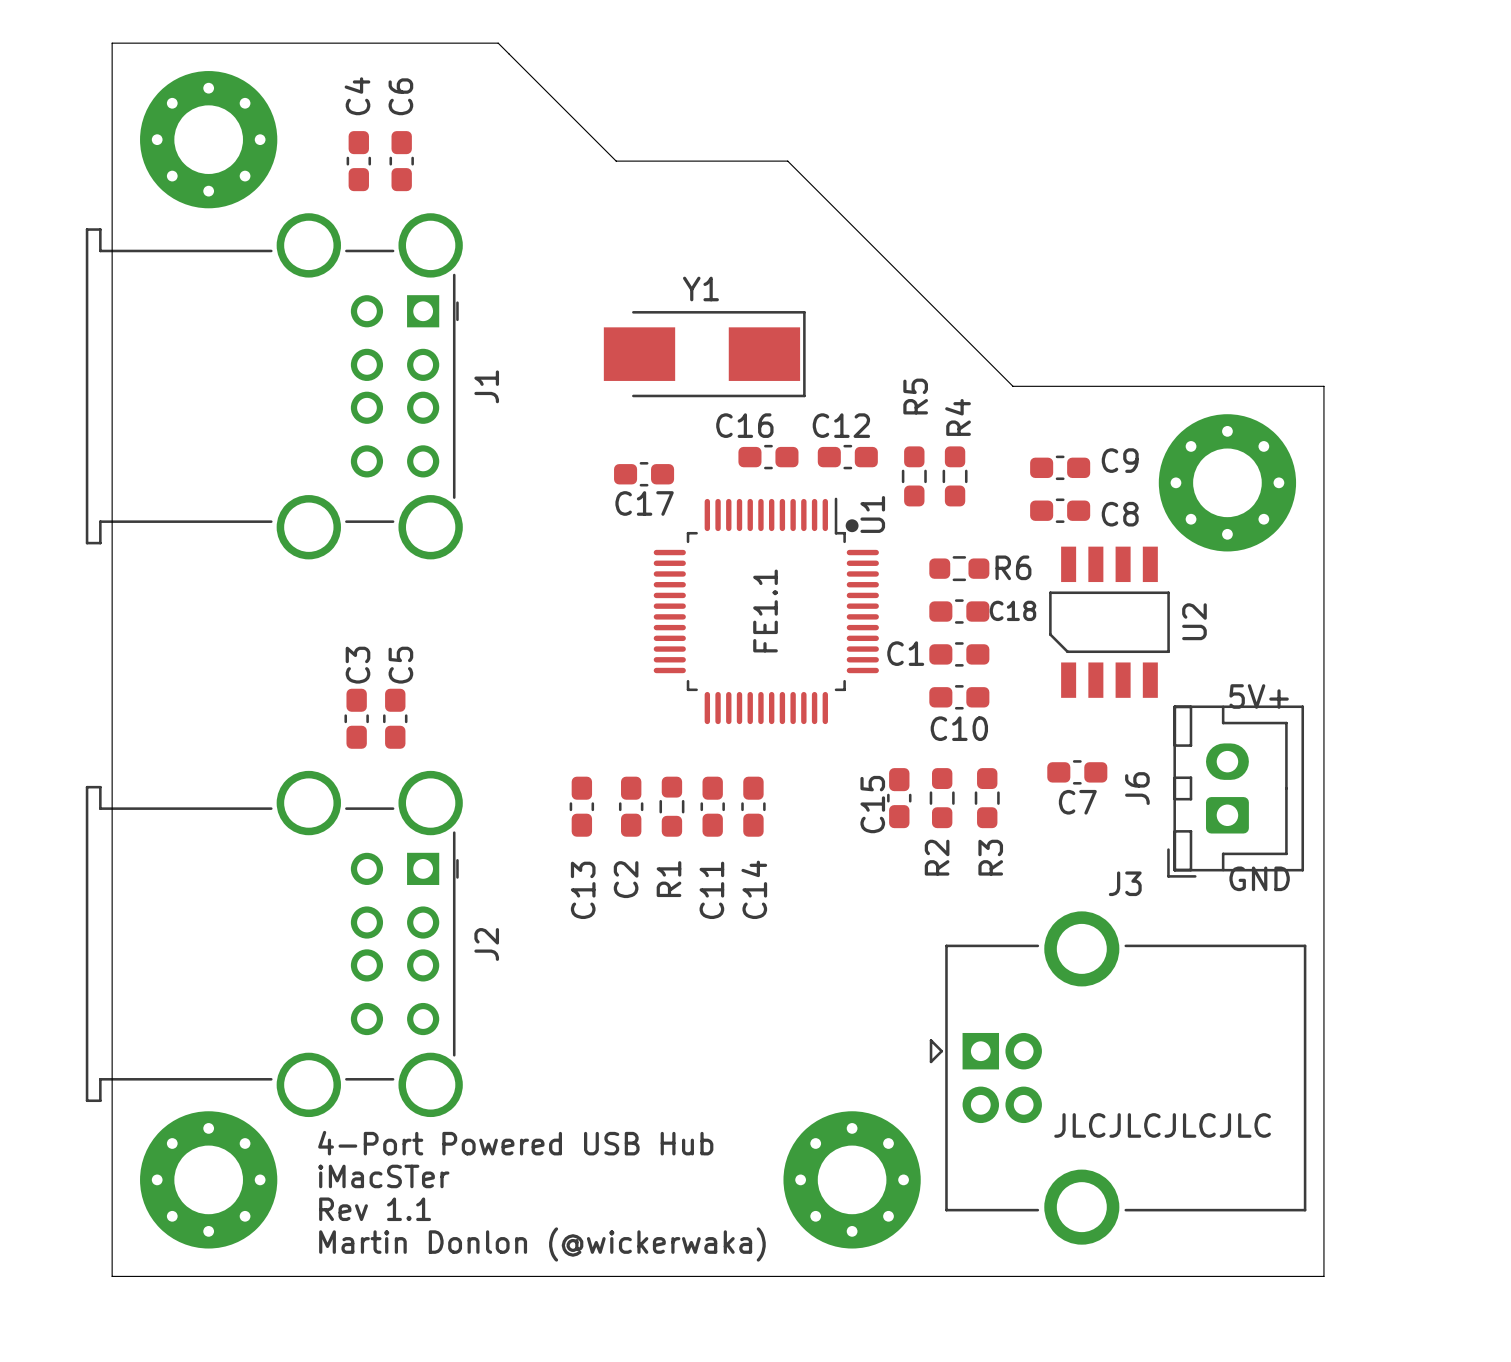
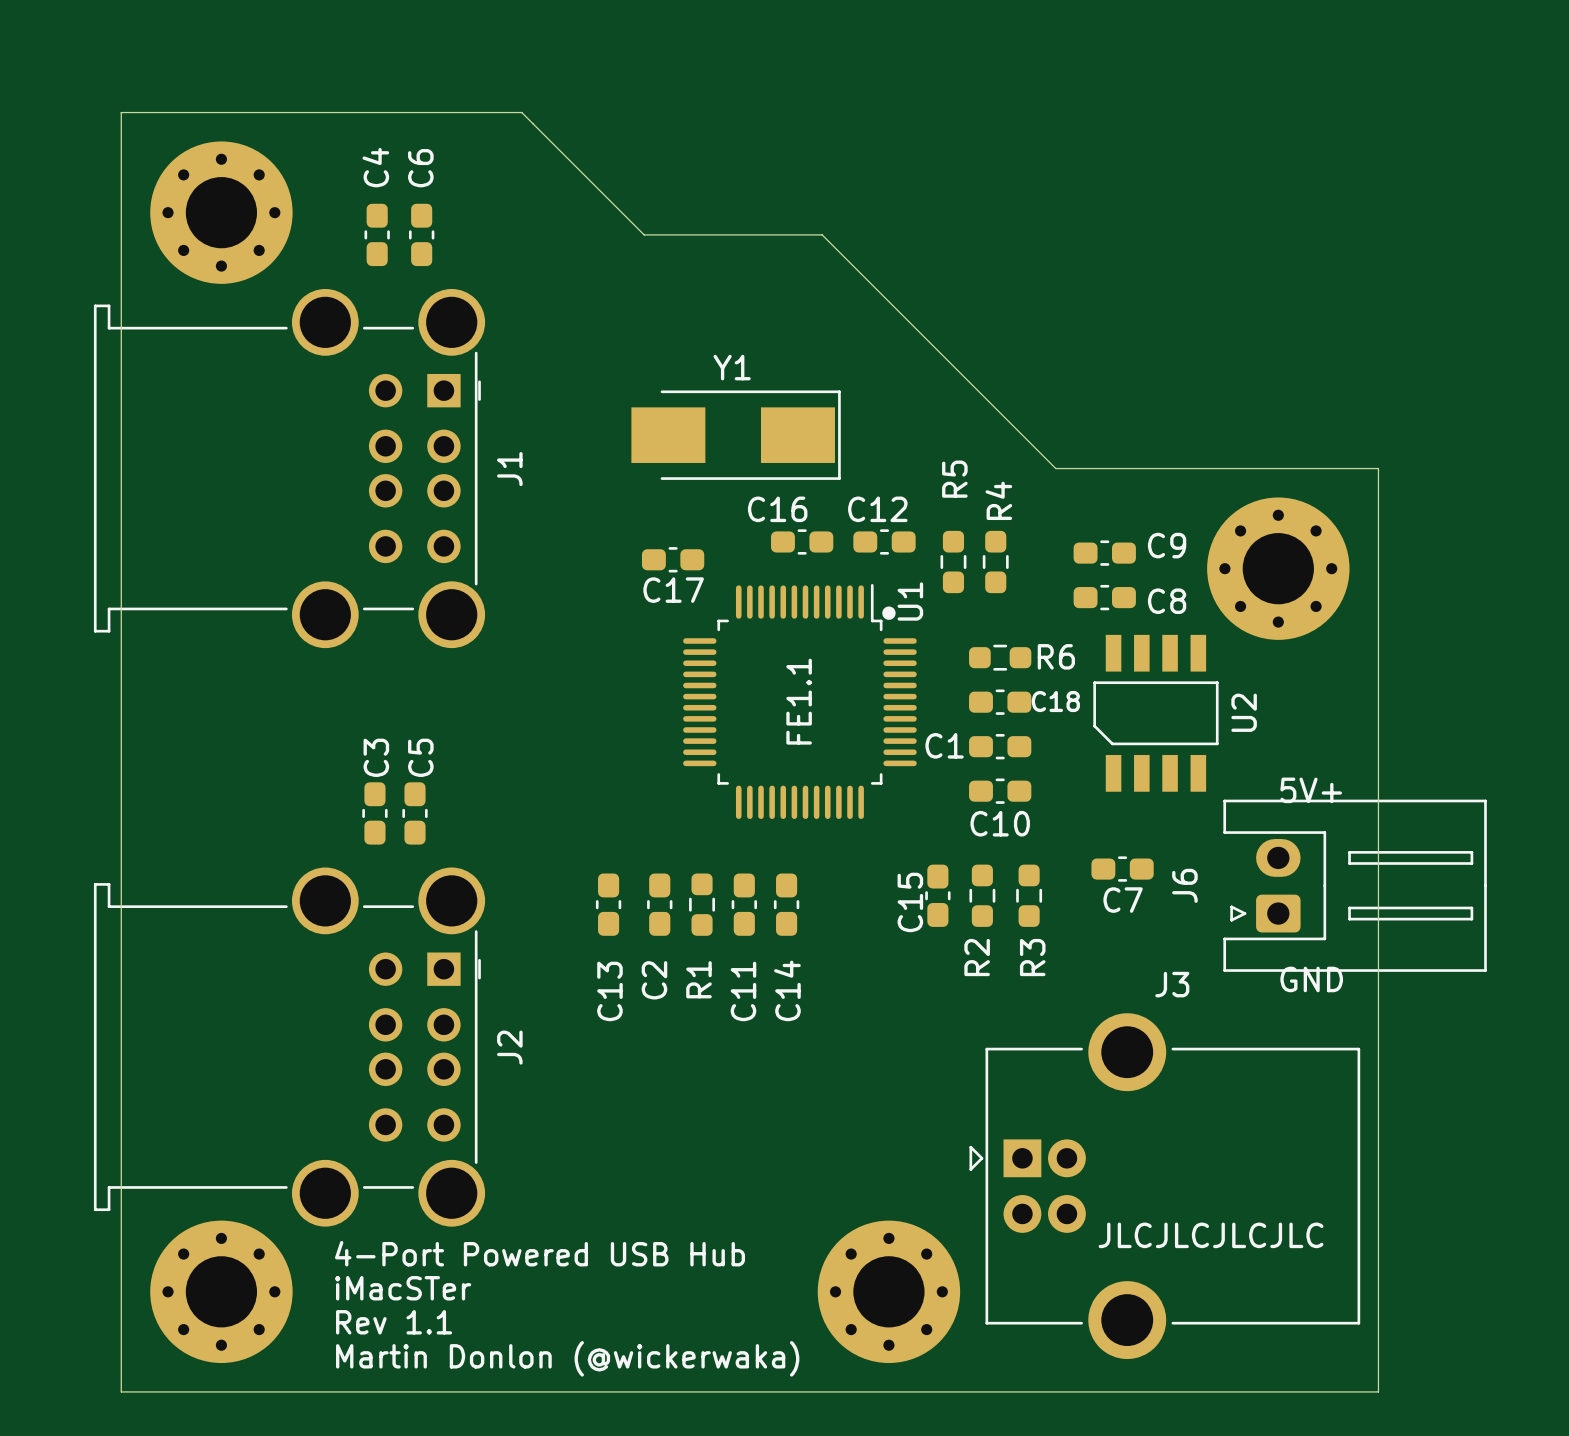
J6 footprint: [1167, 705, 1305, 878] -> [1223, 799, 1487, 972]

